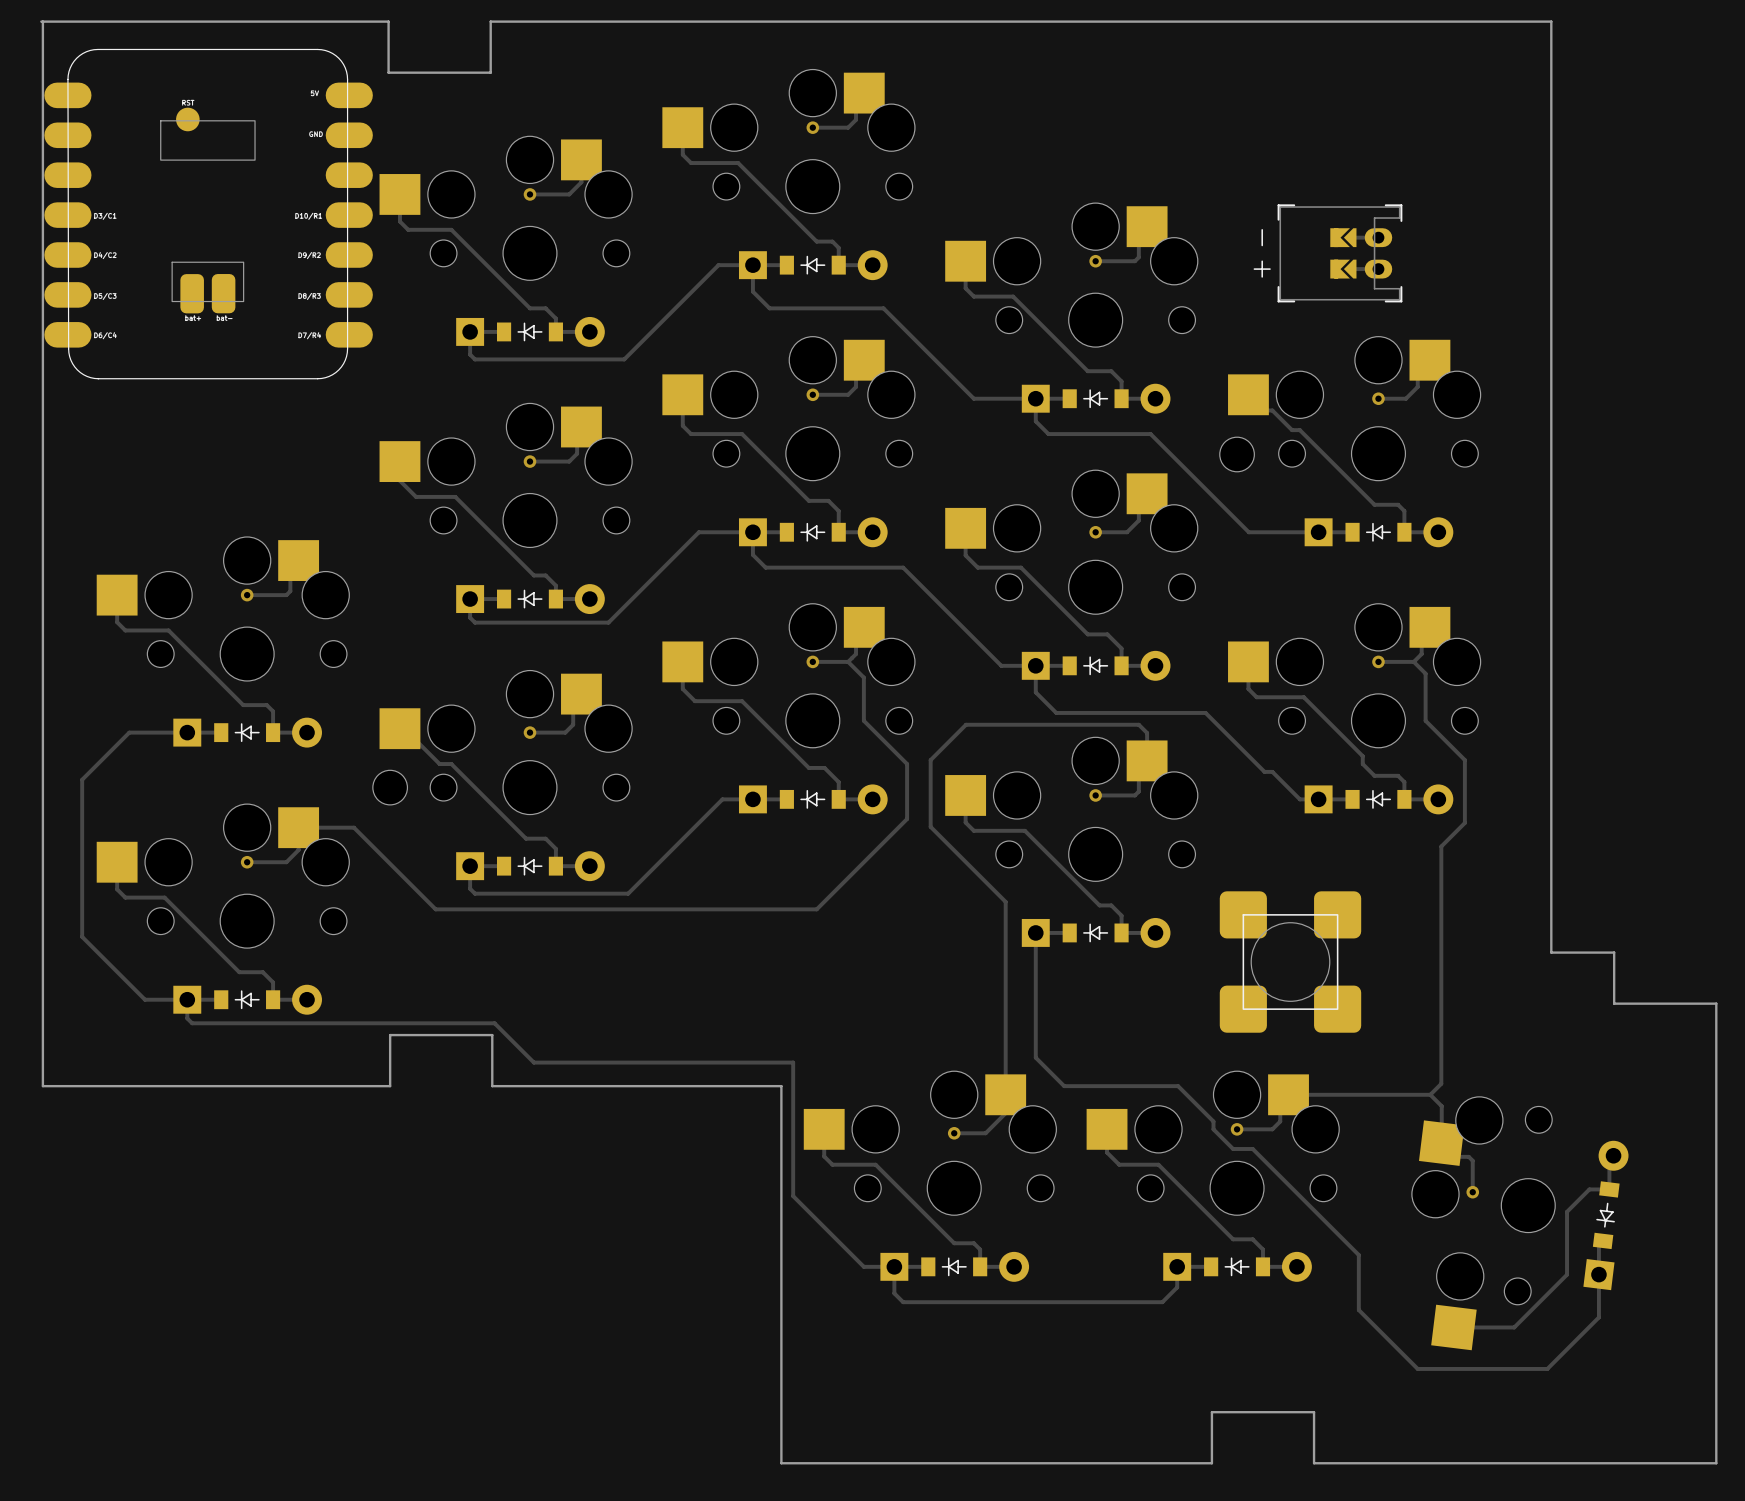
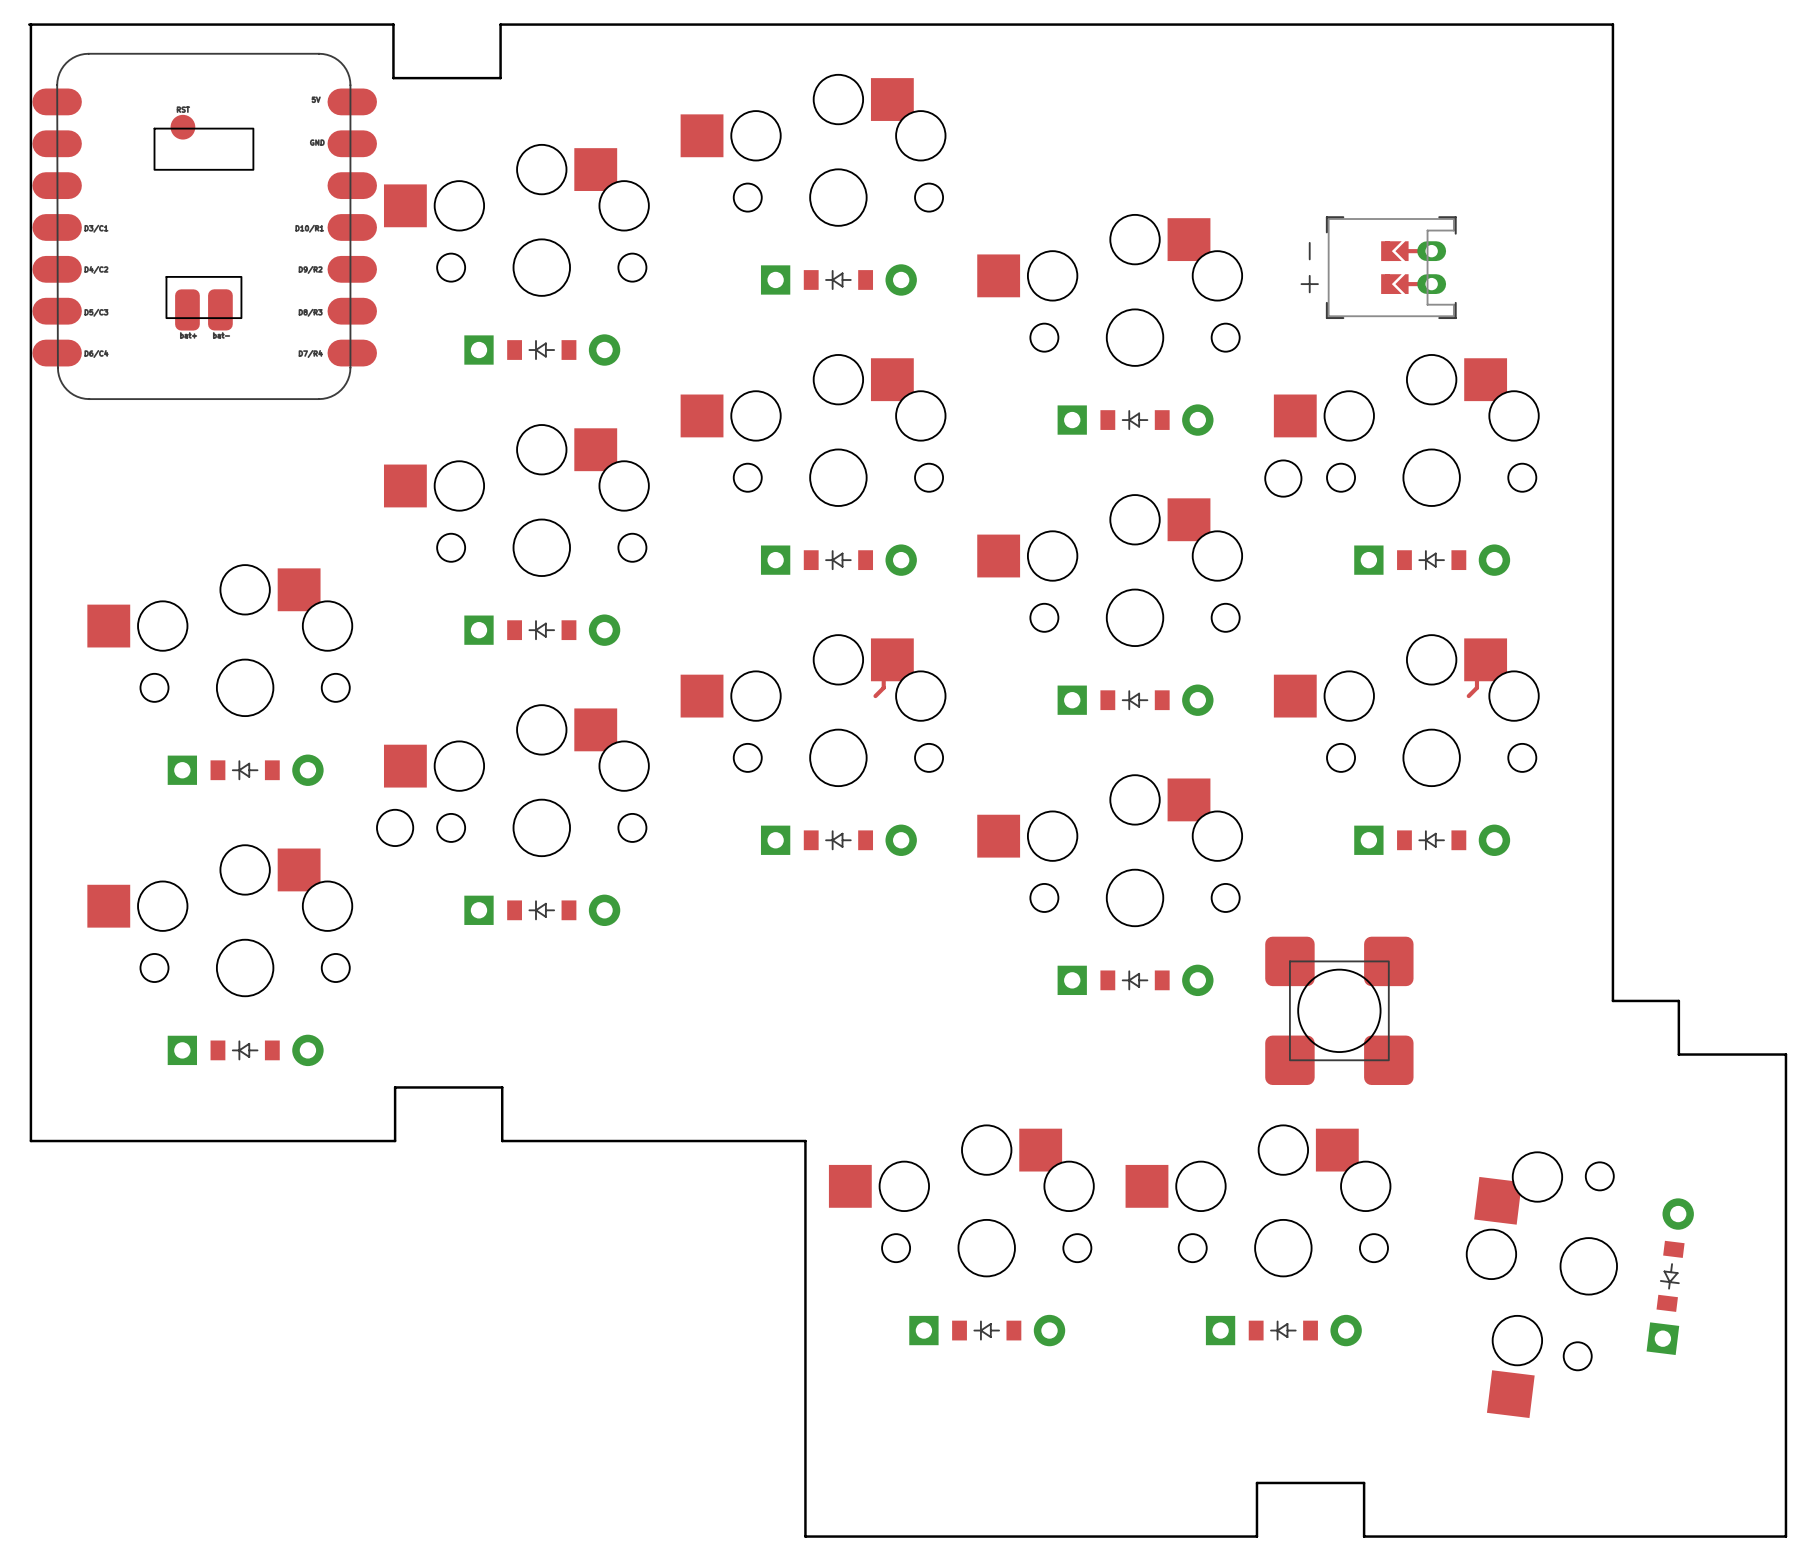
track: (864, 93) (864, 103) (856, 111) (856, 119) (848, 127) (812, 127) -> none
track: (682, 127) (682, 154) (691, 163) (738, 163) (816, 241) (832, 241) (838, 247) (838, 265) (872, 265) -> none
via: (812, 127) -> none
track: (581, 159) (581, 182) (569, 194) (529, 194) -> none
track: (399, 194) (399, 221) (408, 229) (451, 229) (529, 308) (545, 308) (555, 318) (555, 331) (589, 331) -> none
via: (529, 194) -> none
track: (1147, 226) (1147, 233) (1138, 241) (1138, 257) (1134, 261) (1095, 261) -> none
track: (965, 261) (965, 288) (973, 296) (1013, 296) (1087, 371) (1111, 371) (1121, 381) (1121, 398) (1155, 398) -> none
via: (1095, 261) -> none
track: (752, 265) (752, 291) (769, 308) (883, 308) (973, 398) (1069, 398) -> none
track: (786, 265) (718, 265) (624, 359) (474, 359) (470, 354) (470, 331) (504, 331) -> none
track: (864, 360) (864, 362) (856, 371) (856, 386) (848, 394) (812, 394) -> none
track: (1429, 360) (1429, 362) (1417, 375) (1417, 386) (1405, 398) (1378, 398) -> none
track: (682, 394) (682, 425) (691, 434) (742, 434) (808, 500) (828, 500) (838, 511) (838, 532) (872, 532) -> none
via: (812, 394) -> none
track: (1248, 394) (1264, 410) (1272, 410) (1292, 430) (1299, 430) (1374, 504) (1398, 504) (1404, 511) (1404, 532) (1438, 532) -> none
track: (1035, 398) (1035, 421) (1048, 434) (1150, 434) (1248, 532) (1352, 532) -> none
via: (1378, 398) -> none
track: (581, 427) (577, 431) (577, 453) (569, 461) (529, 461) -> none
track: (399, 461) (399, 480) (416, 496) (455, 496) (533, 575) (545, 575) (555, 585) (555, 599) (589, 599) -> none
via: (529, 461) -> none
track: (1147, 493) (1147, 500) (1138, 508) (1138, 520) (1127, 532) (1095, 532) -> none
track: (965, 528) (965, 555) (977, 567) (1021, 567) (1087, 634) (1107, 634) (1121, 648) (1121, 665) (1155, 665) -> none
track: (752, 532) (752, 554) (765, 567) (903, 567) (1001, 665) (1069, 665) -> none
track: (786, 532) (698, 532) (608, 622) (474, 622) (470, 617) (470, 599) (504, 599) -> none
via: (1095, 532) -> none
track: (298, 560) (298, 567) (290, 575) (290, 591) (286, 595) (247, 595) -> none
track: (117, 595) (117, 622) (125, 630) (168, 630) (243, 705) (266, 705) (273, 711) (273, 732) (307, 732) -> none
via: (247, 595) -> none
track: (682, 661) (682, 689) (694, 701) (742, 701) (808, 767) (824, 767) (838, 782) (838, 799) (872, 799) -> none
track: (812, 661) (848, 661) (863, 677) (863, 720) (907, 764) (907, 819) (816, 909) (435, 909) (354, 827) (298, 827) (298, 850) (286, 862) (247, 862) -> none
via: (812, 661) -> none
track: (1248, 661) (1248, 689) (1256, 697) (1303, 697) (1362, 756) (1362, 764) (1374, 775) (1398, 775) (1404, 782) (1404, 799) (1438, 799) -> none
track: (1378, 661) (1413, 661) (1425, 673) (1425, 720) (1464, 760) (1464, 822) (1441, 846) (1441, 1083) (1430, 1094) -> none
via: (1378, 661) -> none
track: (1035, 665) (1035, 692) (1056, 712) (1205, 712) (1264, 771) (1272, 771) (1299, 799) (1352, 799) -> none
track: (581, 694) (573, 702) (573, 724) (565, 732) (529, 732) -> none
track: (399, 728) (404, 728) (439, 764) (451, 764) (526, 838) (545, 838) (555, 848) (555, 866) (589, 866) -> none
track: (221, 732) (129, 732) (82, 779) (82, 936) (145, 999) (221, 999) -> none
via: (529, 732) -> none
track: (965, 795) (965, 822) (973, 830) (1024, 830) (1099, 905) (1111, 905) (1121, 915) (1121, 932) (1155, 932) -> none
track: (1095, 795) (1134, 795) (1138, 791) (1138, 769) (1147, 760) (1147, 733) (1138, 724) (966, 724) (930, 760) (930, 826) (1005, 901) (1005, 1113) (985, 1133) (954, 1133) -> none
via: (1095, 795) -> none
track: (786, 799) (722, 799) (628, 893) (474, 893) (470, 888) (470, 866) (504, 866) -> none
track: (117, 862) (117, 889) (125, 897) (164, 897) (239, 972) (262, 972) (273, 982) (273, 999) (307, 999) -> none
via: (247, 862) -> none
track: (1069, 932) (1035, 932) (1035, 1057) (1064, 1086) (1178, 1086) (1213, 1121) (1213, 1129) (1233, 1149) (1252, 1149) (1358, 1255) (1358, 1310) (1417, 1368) (1547, 1368) (1598, 1317) (1598, 1245) (1603, 1240) -> none
track: (187, 999) (187, 1018) (192, 1023) (494, 1023) (533, 1062) (793, 1062) (793, 1196) (863, 1266) (928, 1266) -> none
track: (1430, 1094) (1287, 1094) (1280, 1101) (1280, 1121) (1272, 1129) (1237, 1129) -> none
track: (1430, 1094) (1441, 1106) (1441, 1143) (1455, 1156) (1468, 1156) (1472, 1160) (1472, 1192) -> none
track: (824, 1129) (824, 1156) (832, 1164) (875, 1164) (954, 1243) (973, 1243) (980, 1249) (980, 1266) (1014, 1266) -> none
track: (1107, 1129) (1107, 1152) (1119, 1164) (1158, 1164) (1233, 1239) (1252, 1239) (1262, 1249) (1262, 1266) (1296, 1266) -> none
via: (1237, 1129) -> none
via: (954, 1133) -> none
track: (1613, 1155) (1609, 1159) (1609, 1189) (1589, 1189) (1567, 1211) (1567, 1274) (1514, 1327) (1453, 1327) -> none
via: (1472, 1192) -> none
track: (894, 1266) (894, 1293) (903, 1302) (1162, 1302) (1177, 1287) (1177, 1266) (1211, 1266) -> none

